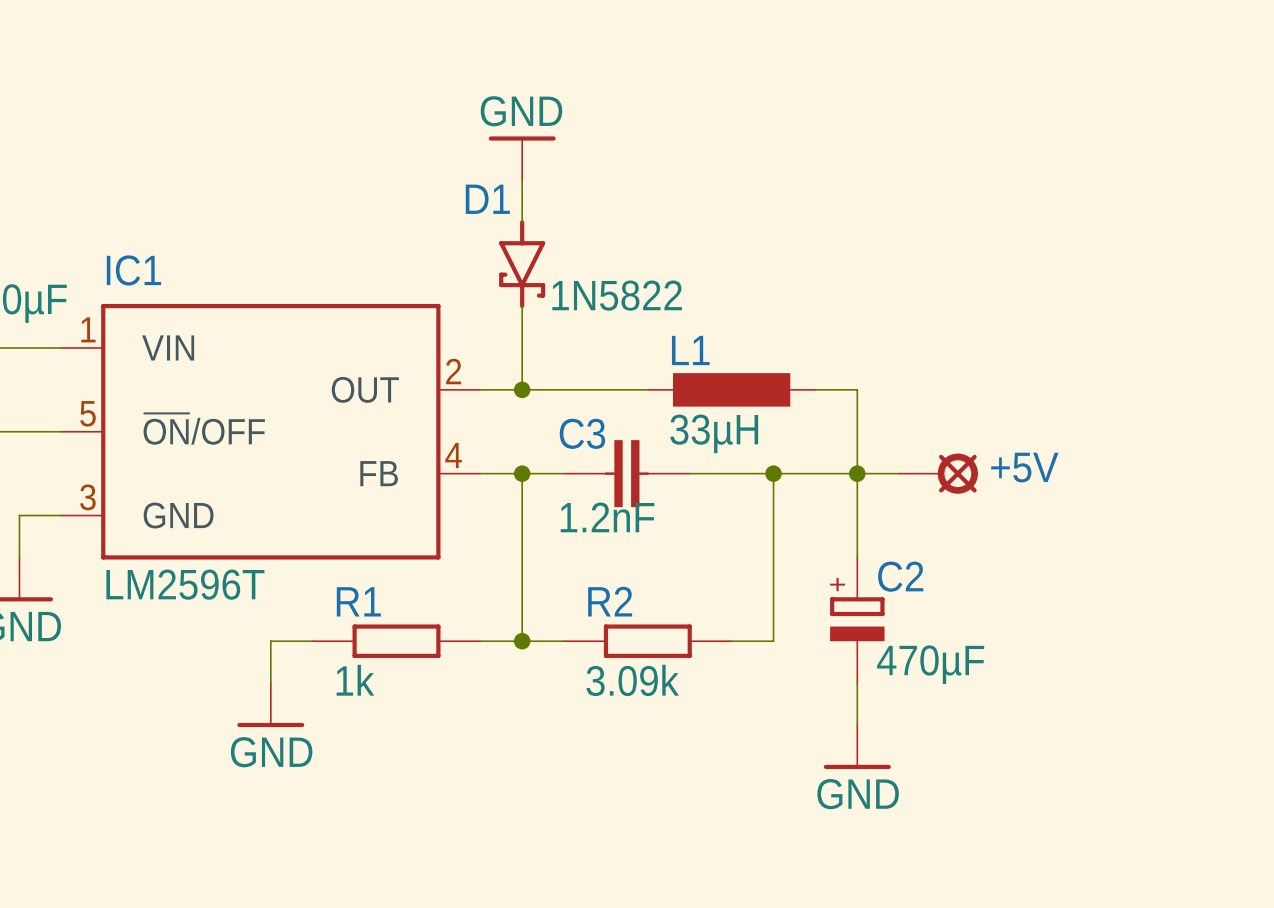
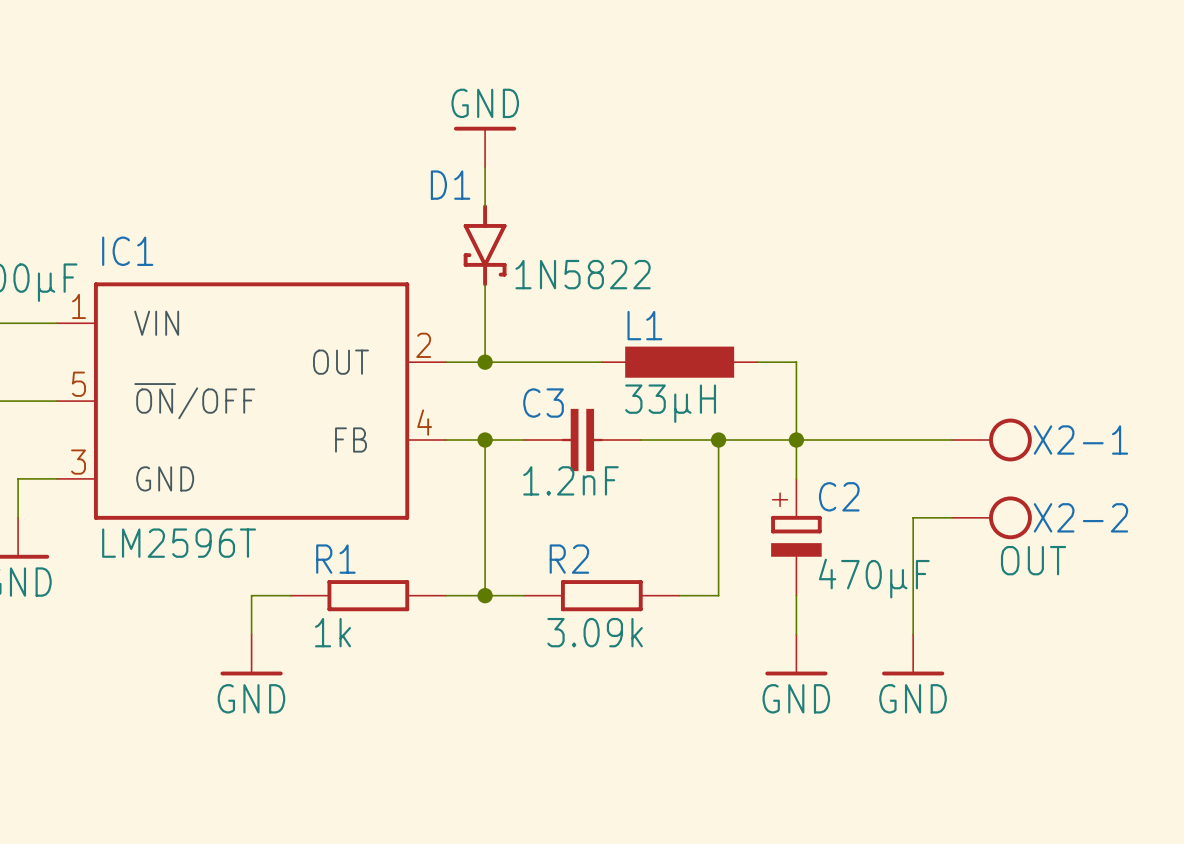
wire: none -> (835, 440) (952, 440)
+5V: (938, 473) -> none
X2-1: none -> (991, 440)
wire: none -> (952, 517) (913, 517) (913, 634)
X2-2: none -> OUT (991, 517)
C2 position: (857, 620) -> (796, 537)
power symbol: none -> GND (913, 655)
power symbol position: GND (857, 746) -> GND (796, 655)

